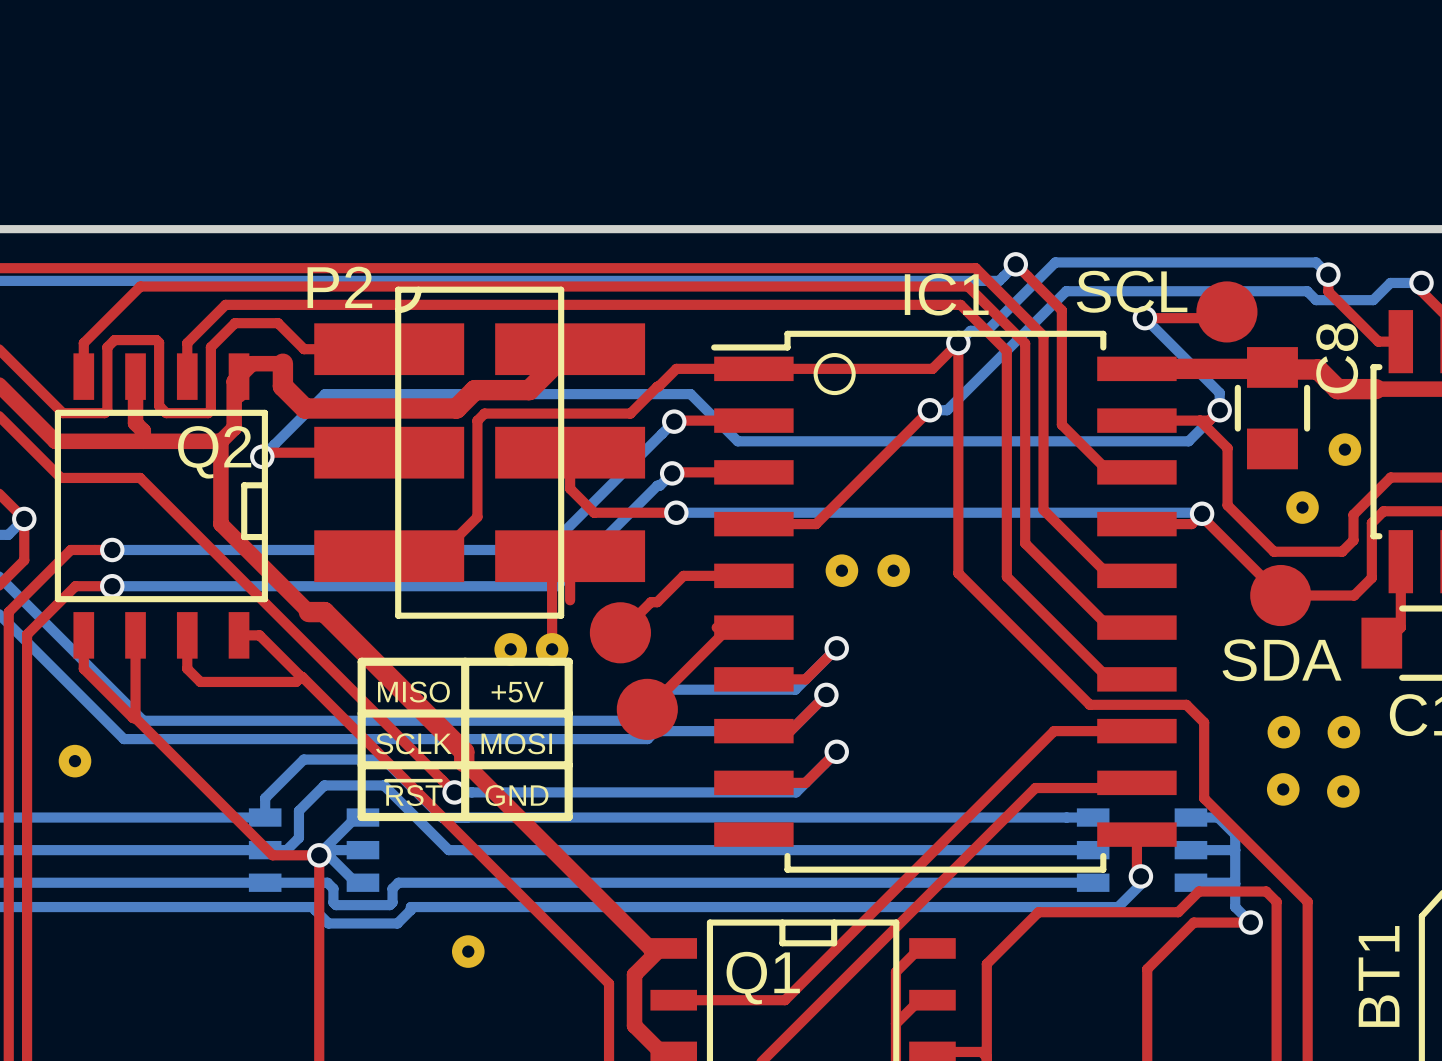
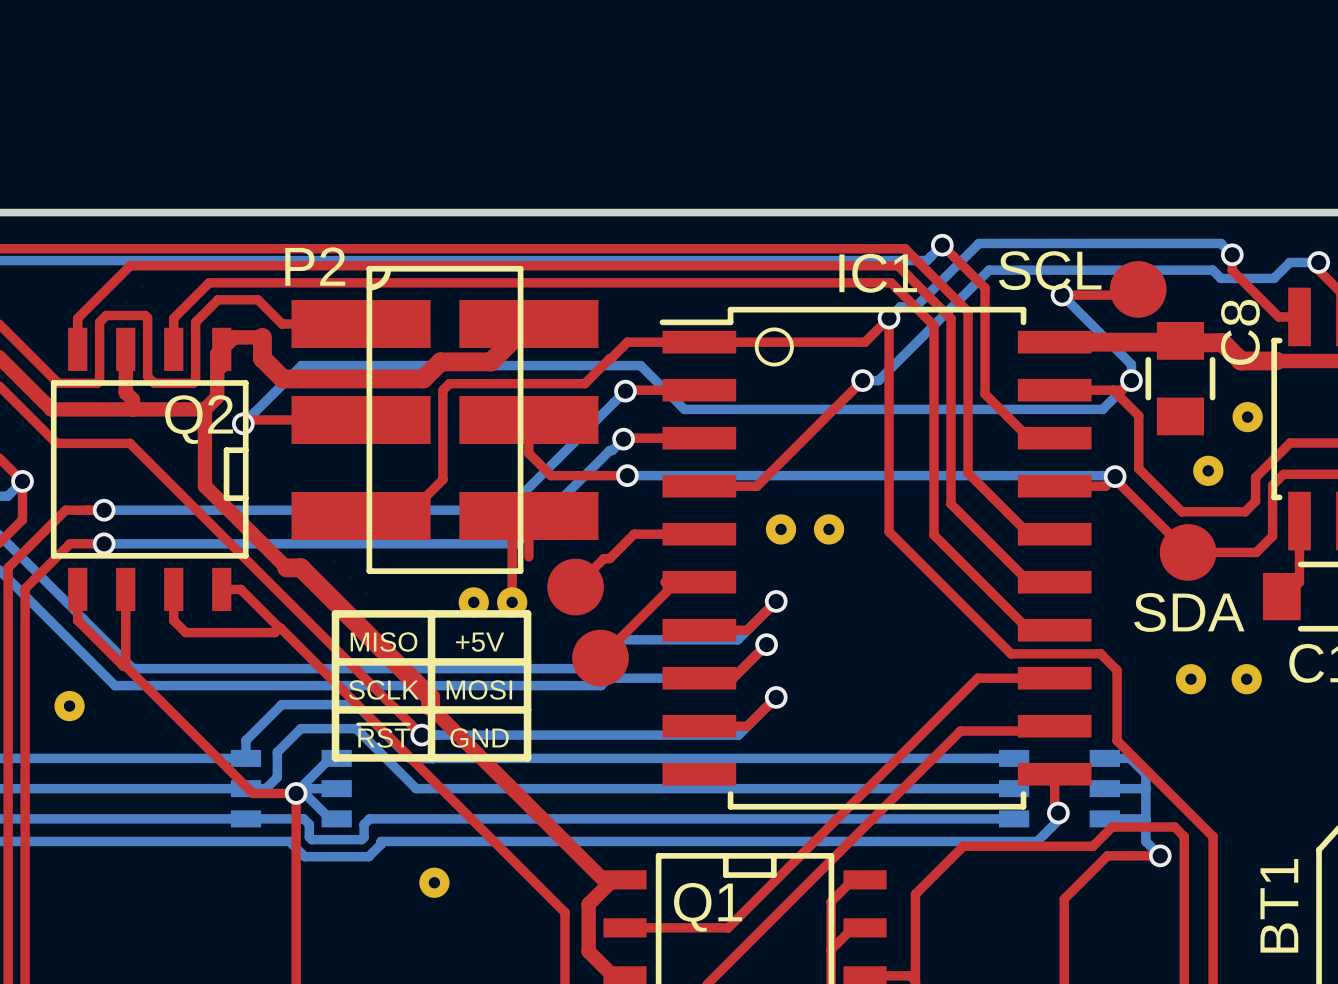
part: (1283, 789) -> none
part: (1343, 791) -> none

